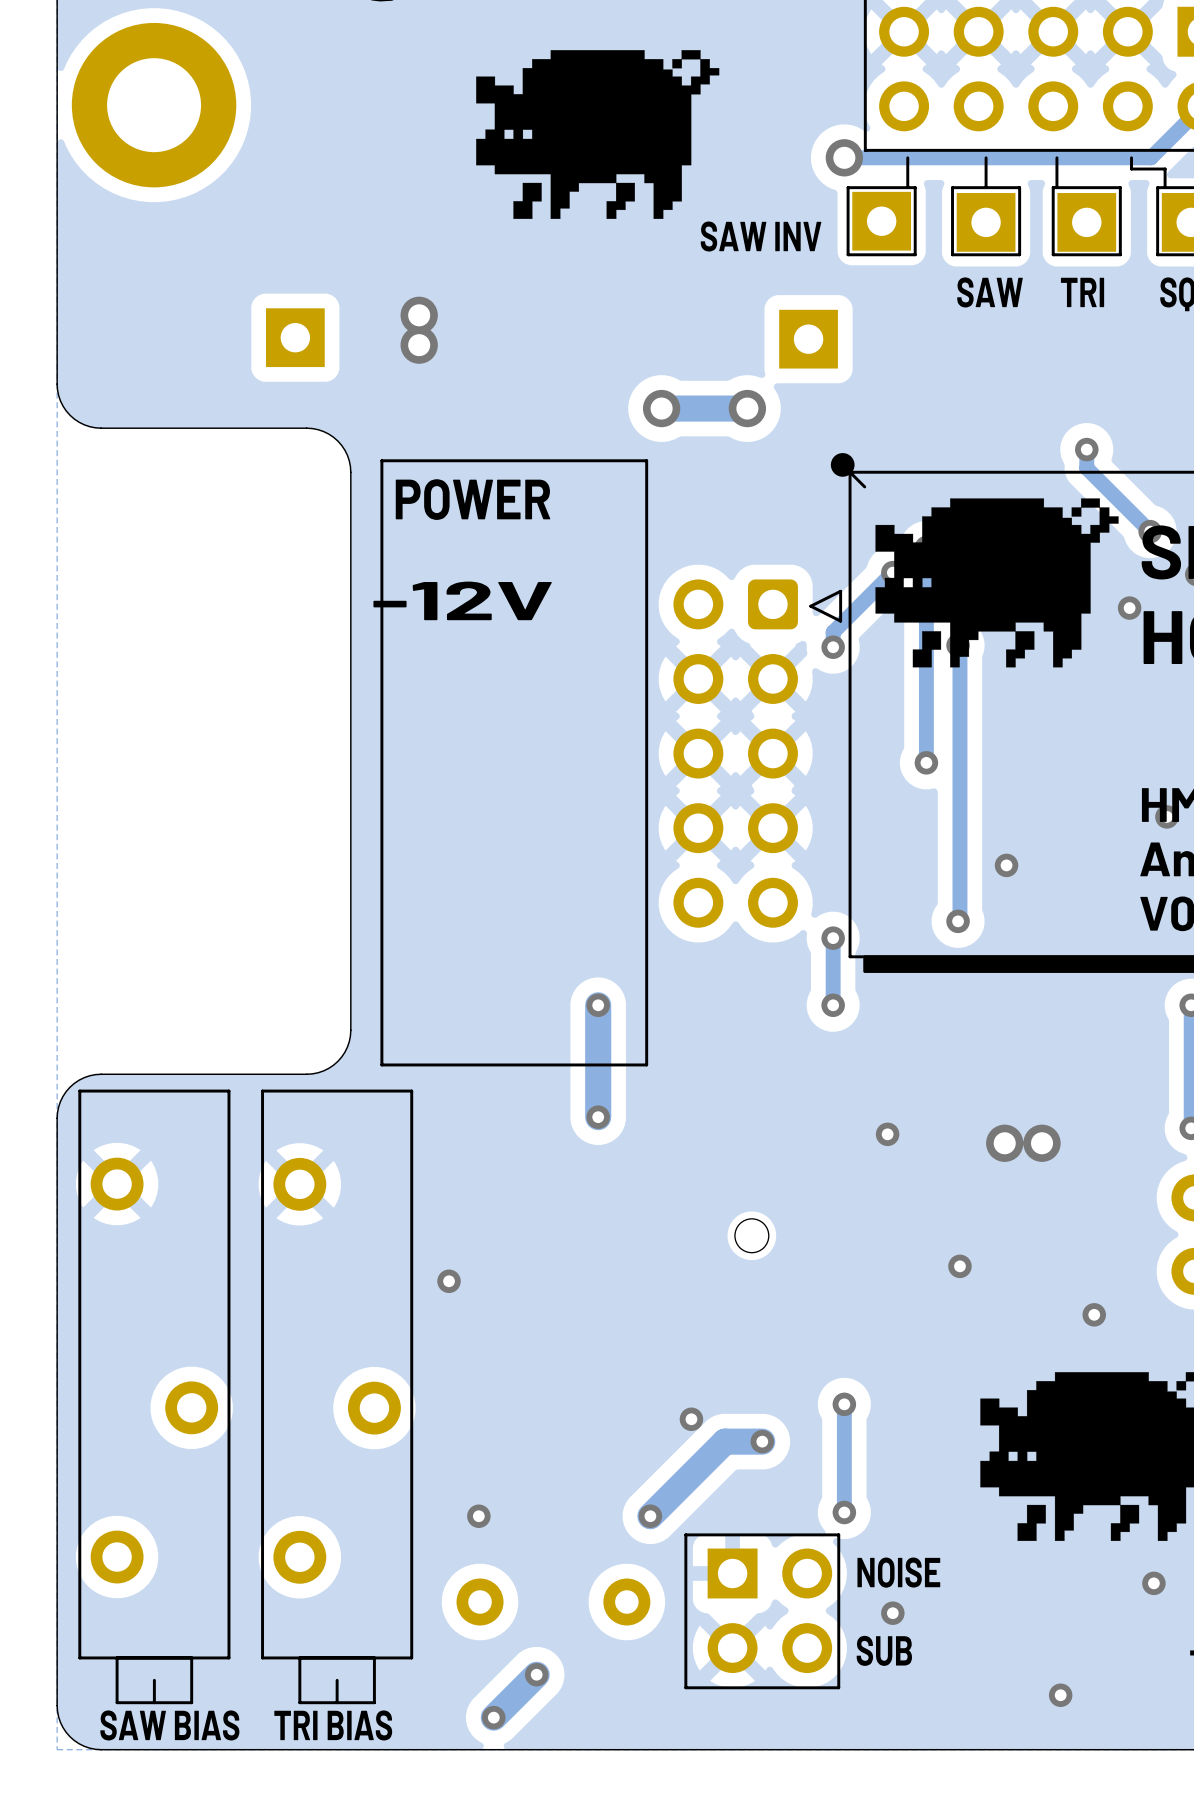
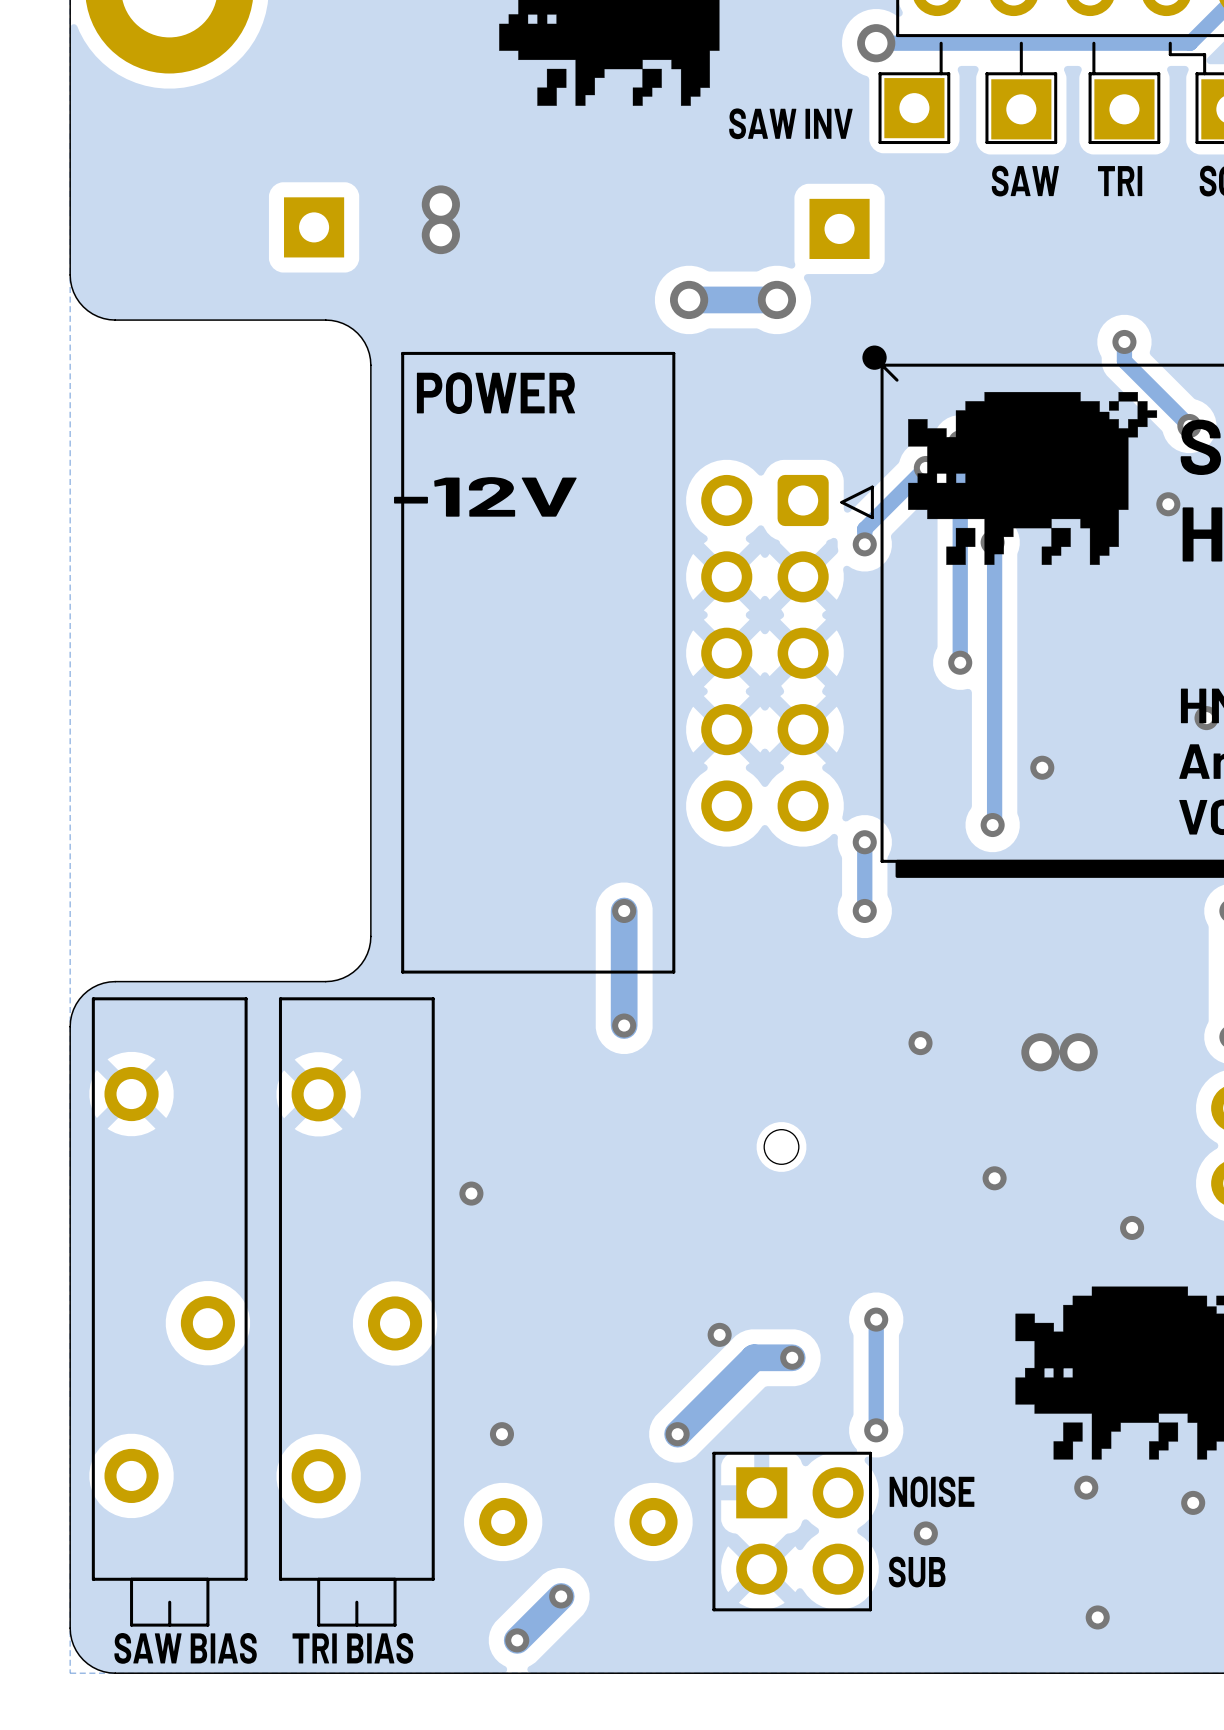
via: none -> (1086, 1487)

